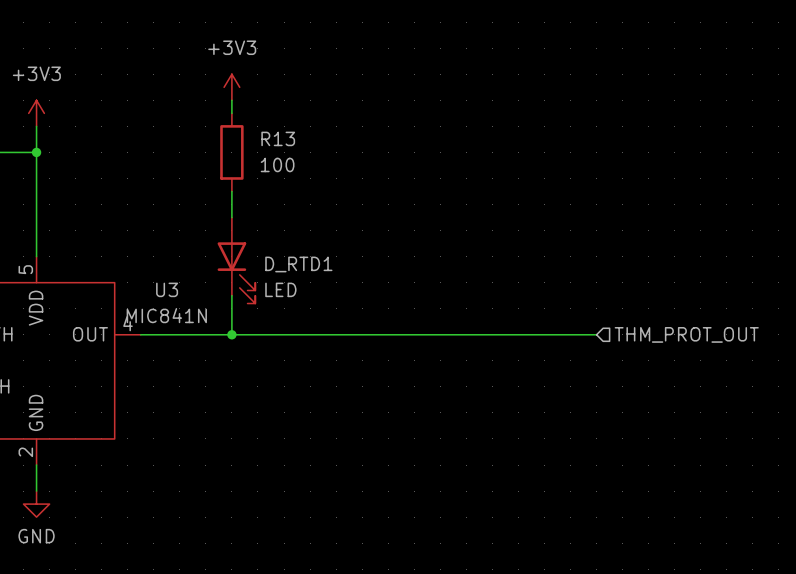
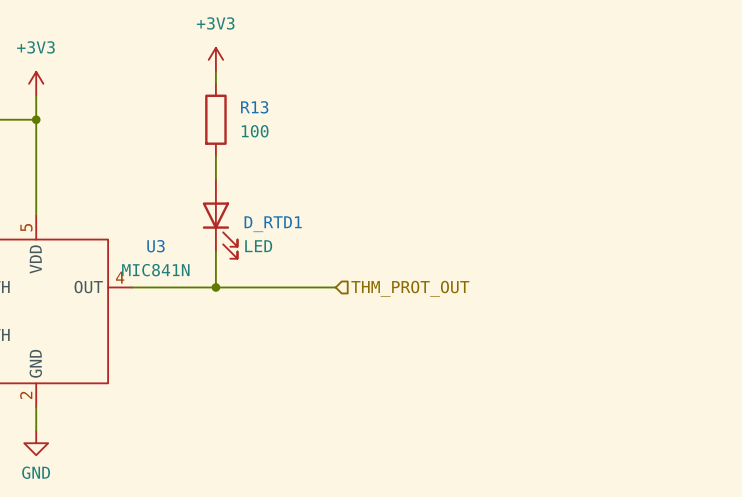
wire: (362, 334) (596, 334) -> none
hierarchical label position: THM_PROT_OUT (686, 334) -> THM_PROT_OUT (410, 288)

